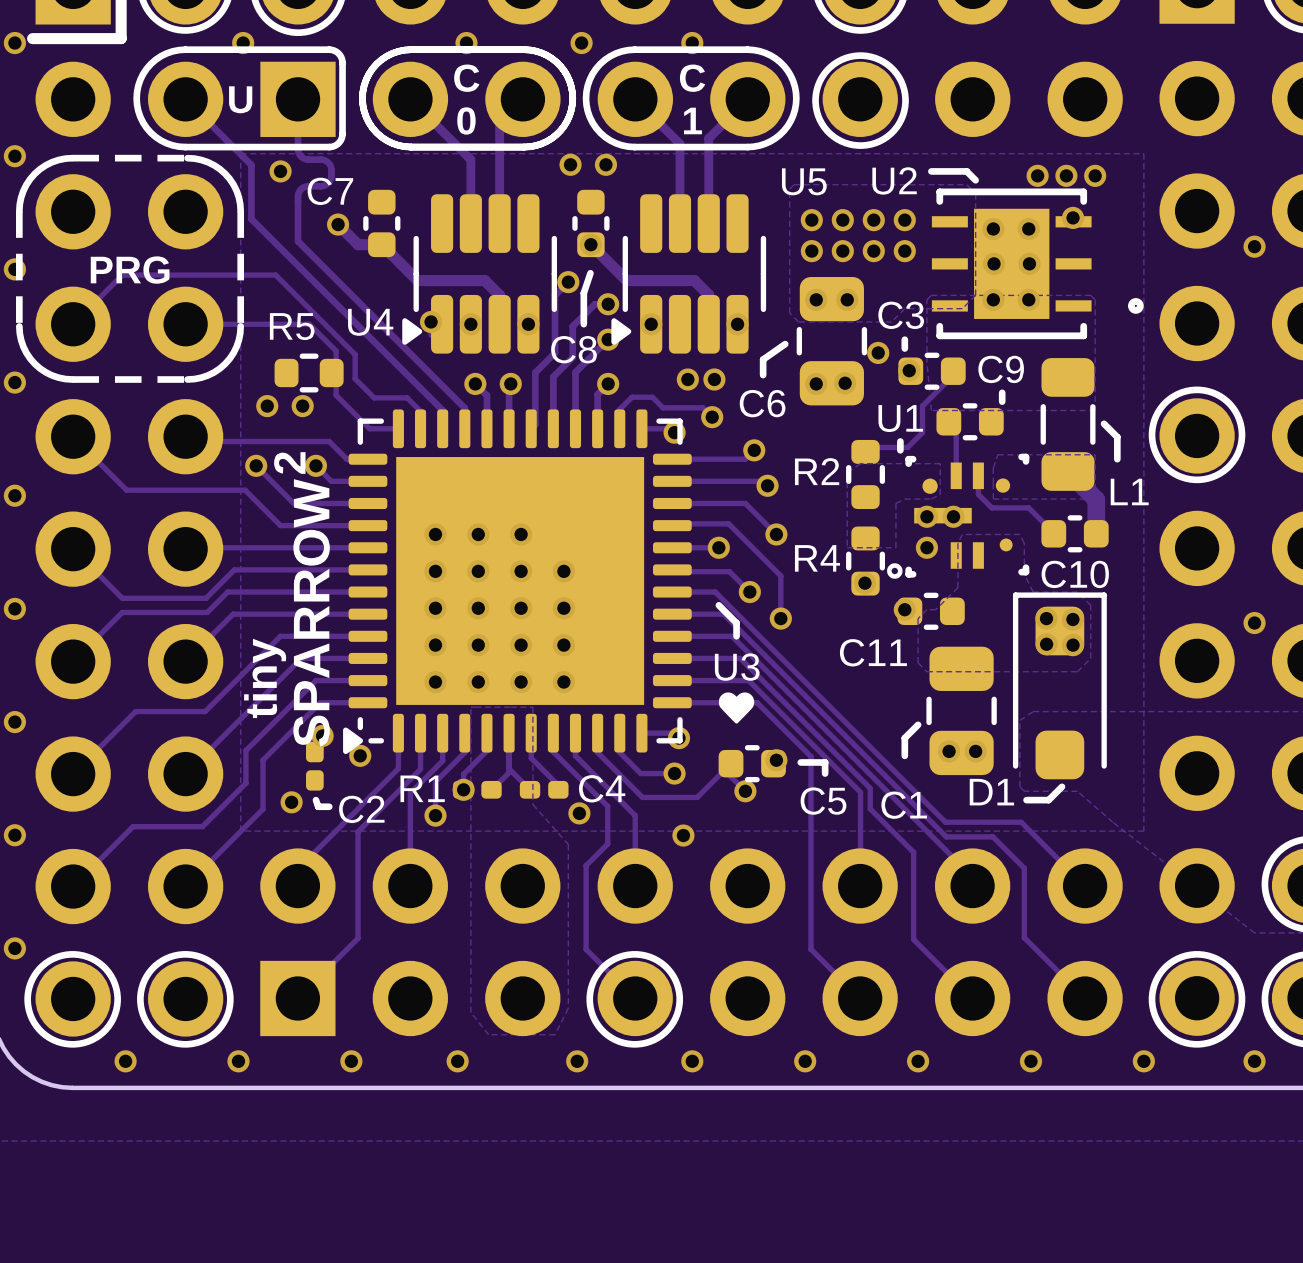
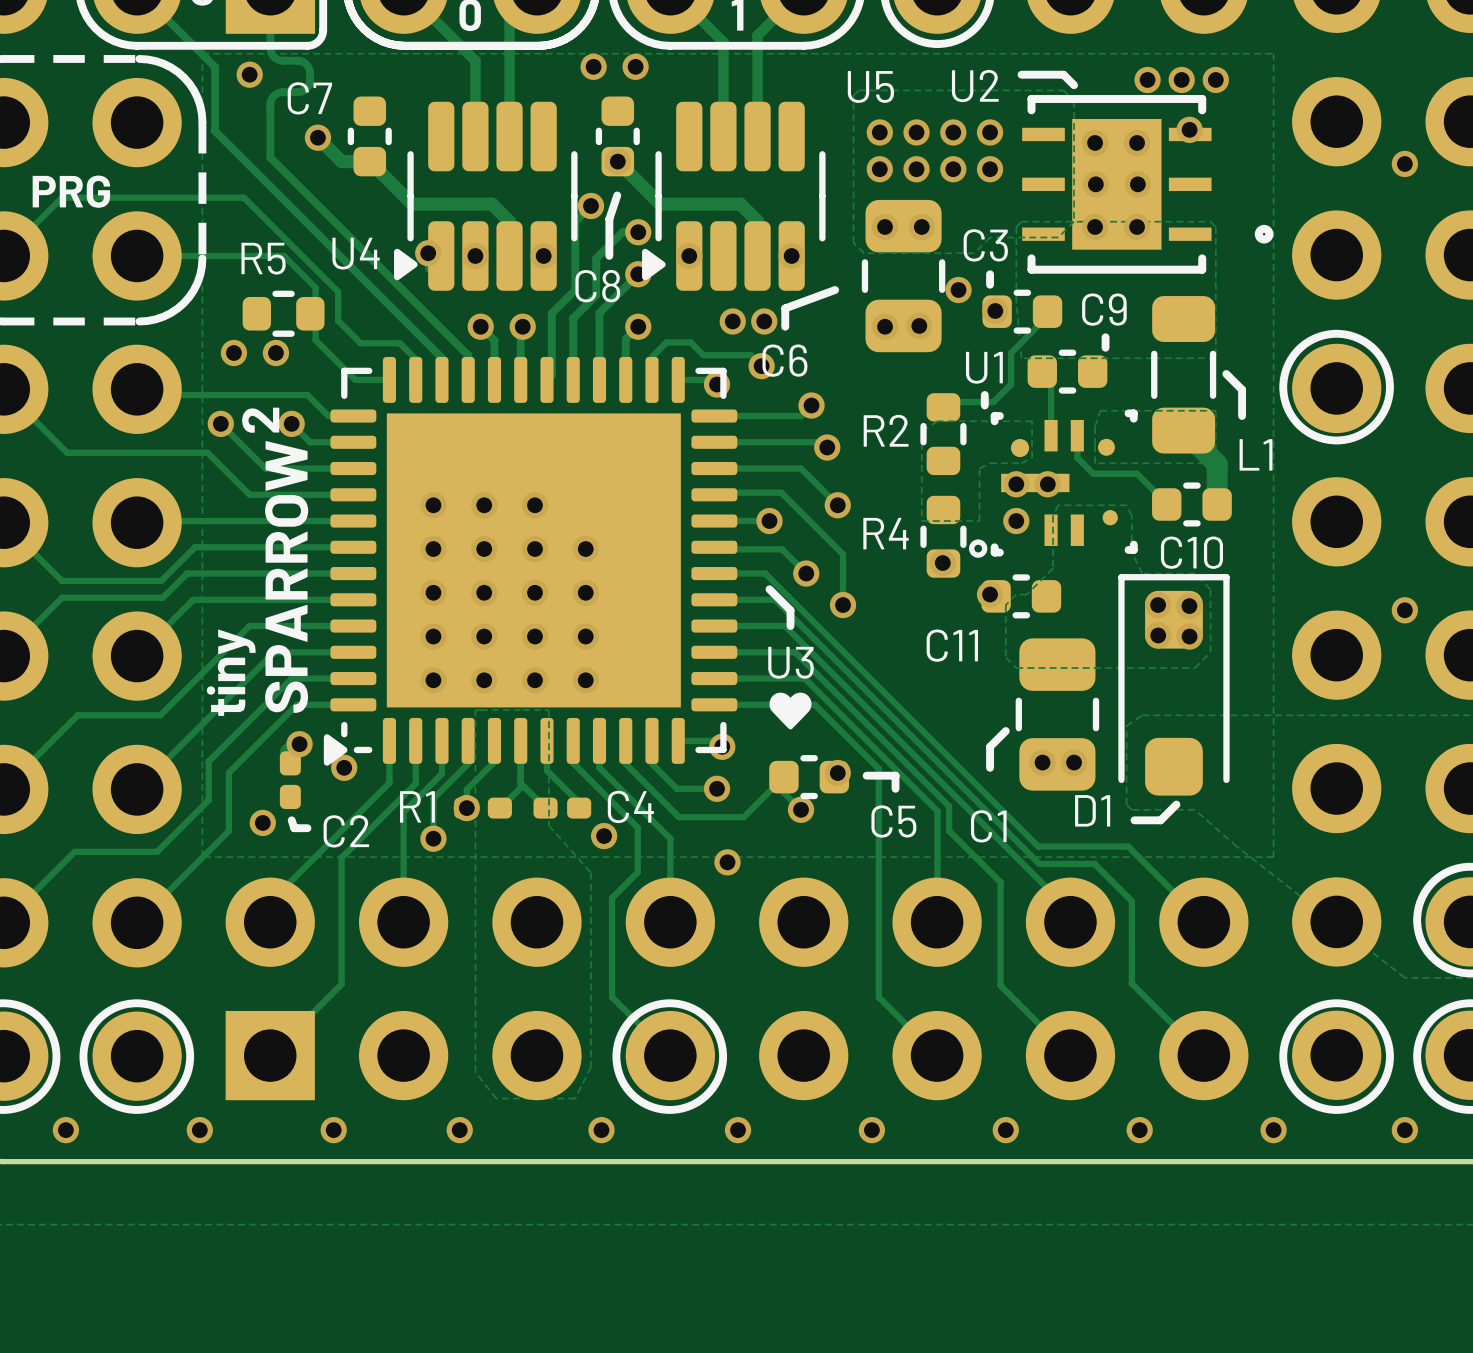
line: (785, 344) (763, 359) (763, 375) -> none
line: none -> (835, 289) (785, 308) (785, 326)
C6 name position: C6 (762, 403) -> C6 (784, 360)

